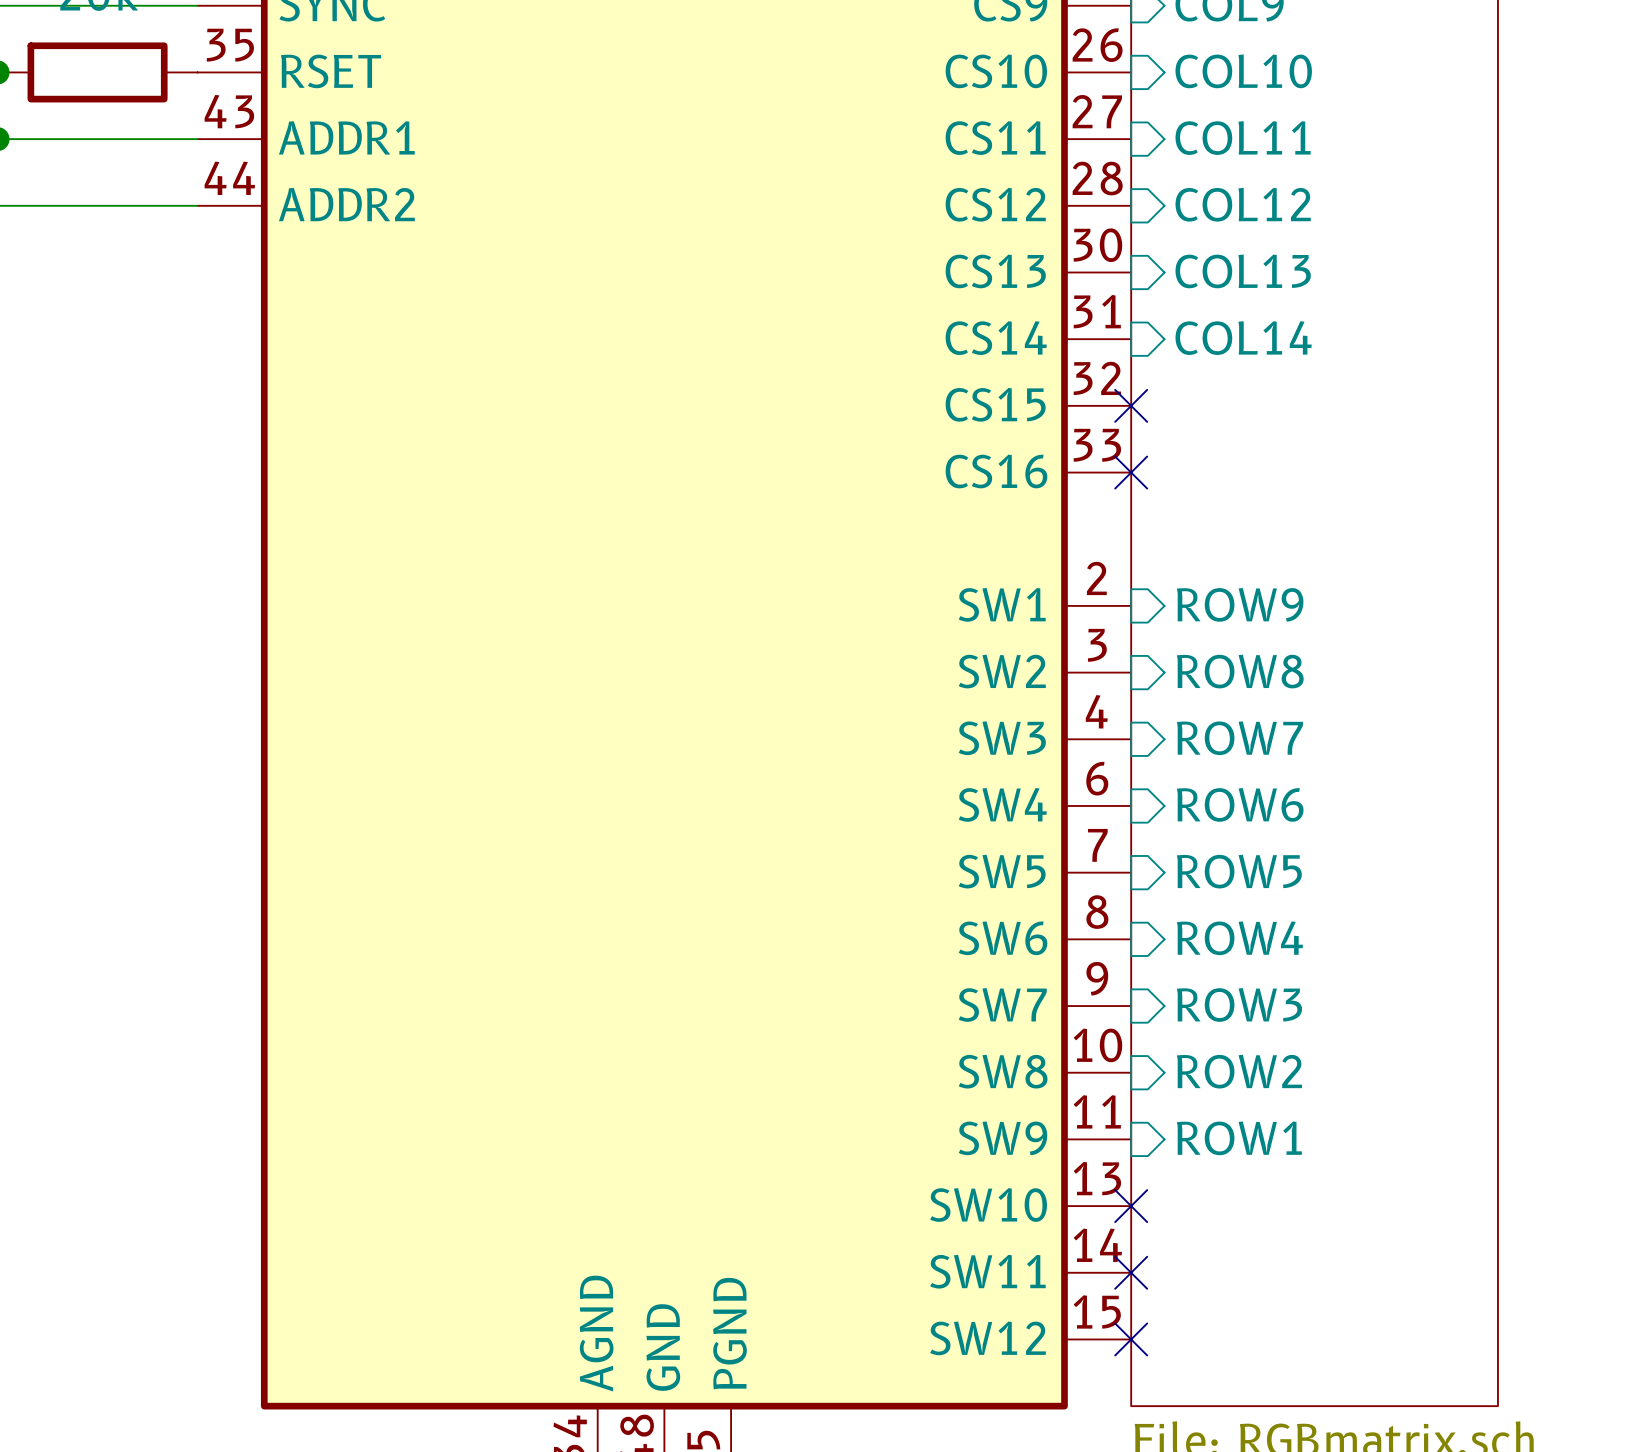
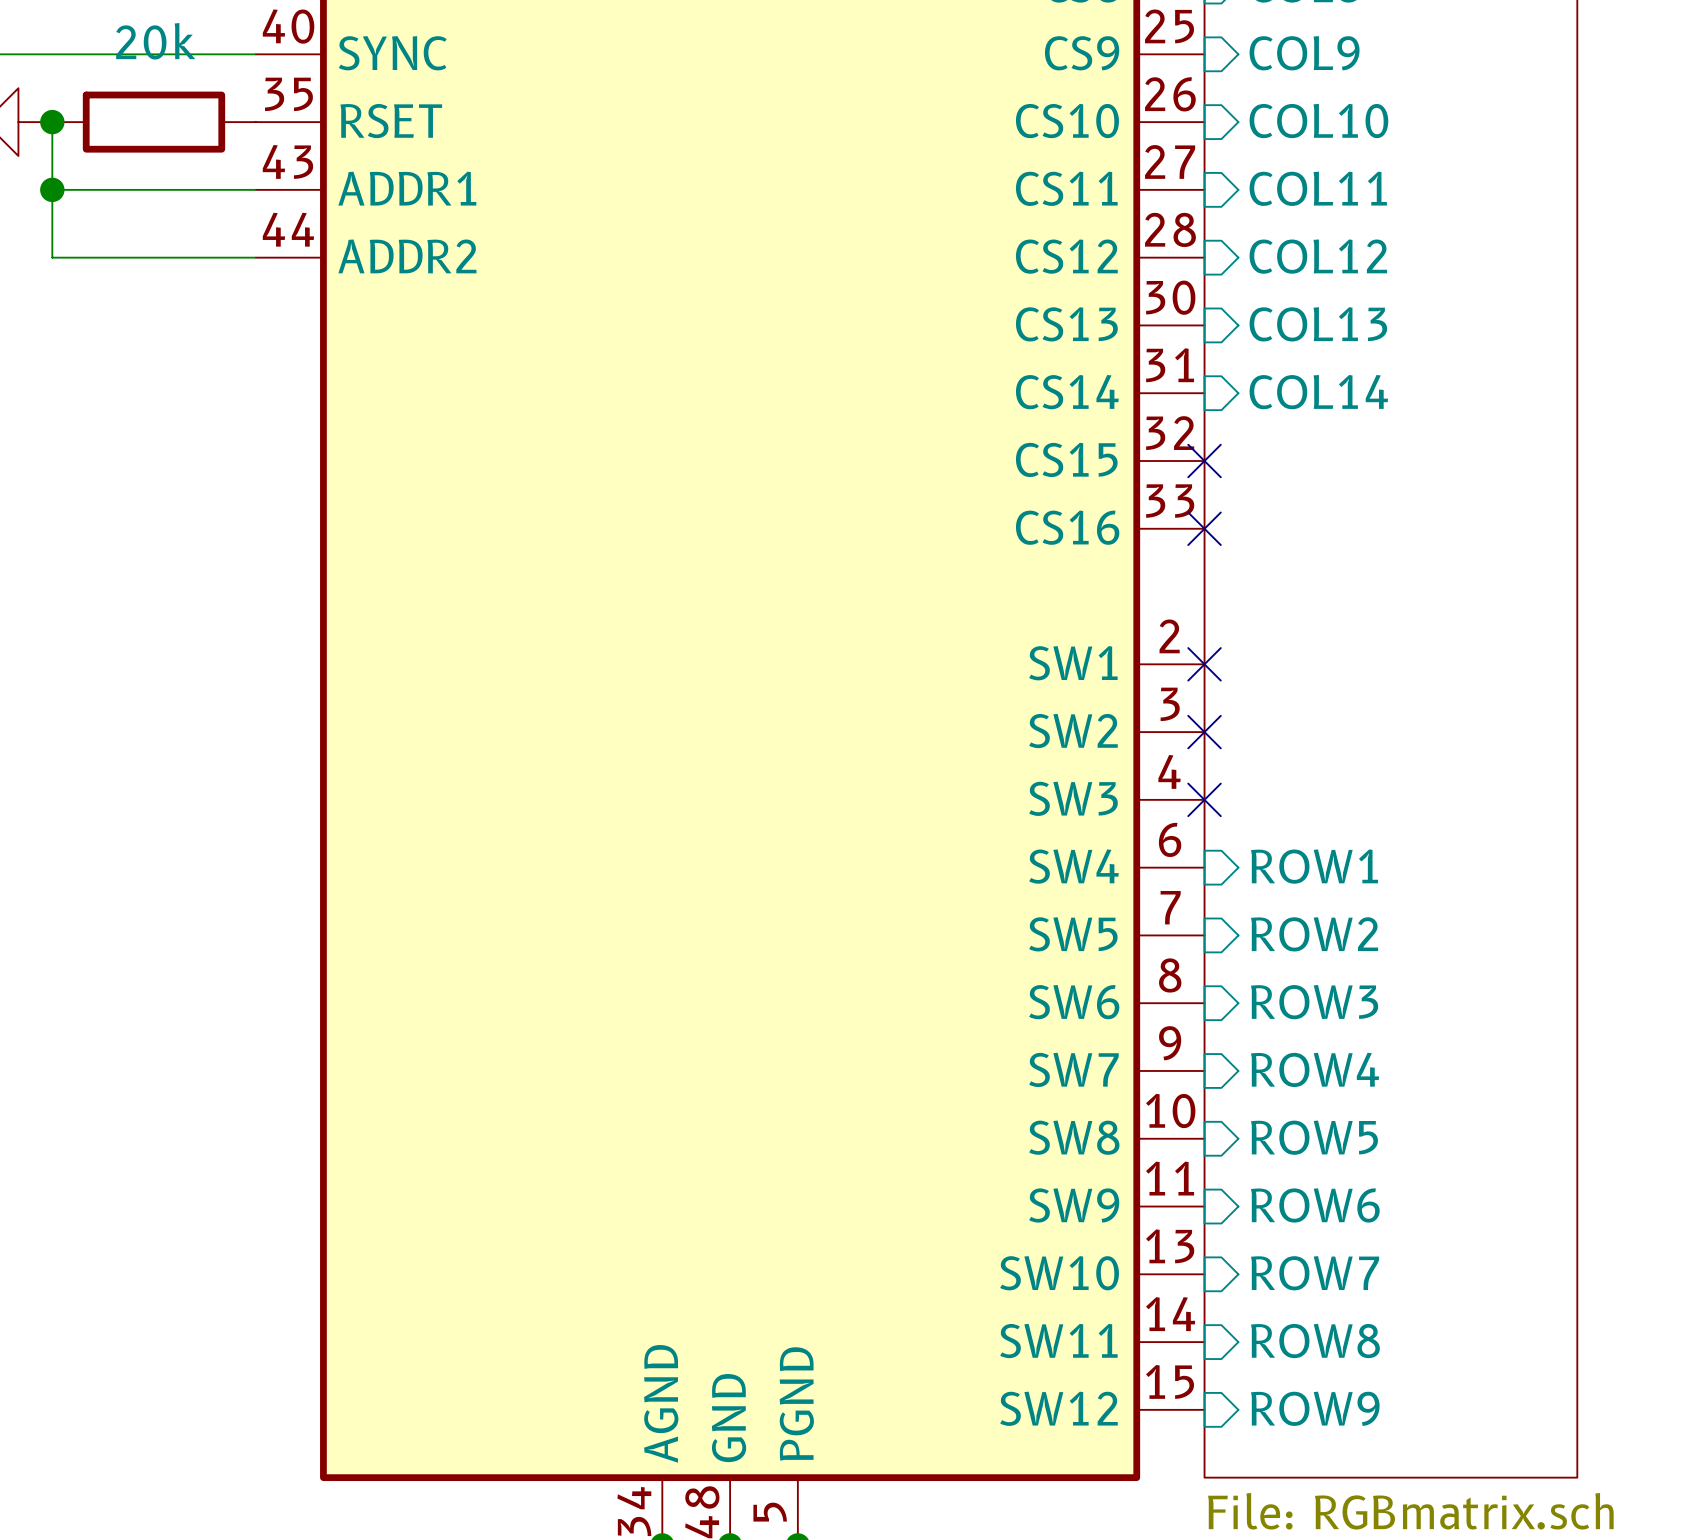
sheet pin: ROW9 (1240, 604) -> none
no-connect mark: none -> (1204, 664)
sheet pin position: ROW8 (1240, 671) -> ROW8 (1315, 1341)
no-connect mark: none -> (1204, 732)
sheet pin position: ROW7 (1239, 738) -> ROW7 (1315, 1273)
no-connect mark: none -> (1204, 799)
sheet pin: ROW6 (1240, 804) -> ROW1 (1314, 866)
sheet pin: ROW5 (1239, 871) -> ROW2 (1314, 934)
sheet pin: ROW4 (1239, 938) -> ROW3 (1314, 1002)
sheet pin: ROW3 (1239, 1004) -> ROW4 (1315, 1069)
sheet pin: ROW2 (1239, 1071) -> ROW5 (1314, 1137)
sheet pin: ROW1 (1239, 1138) -> ROW6 (1315, 1205)
no-connect mark: (1131, 1206) -> none
no-connect mark: (1131, 1272) -> none
sheet pin: none -> ROW9 (1315, 1408)
no-connect mark: (1131, 1339) -> none

